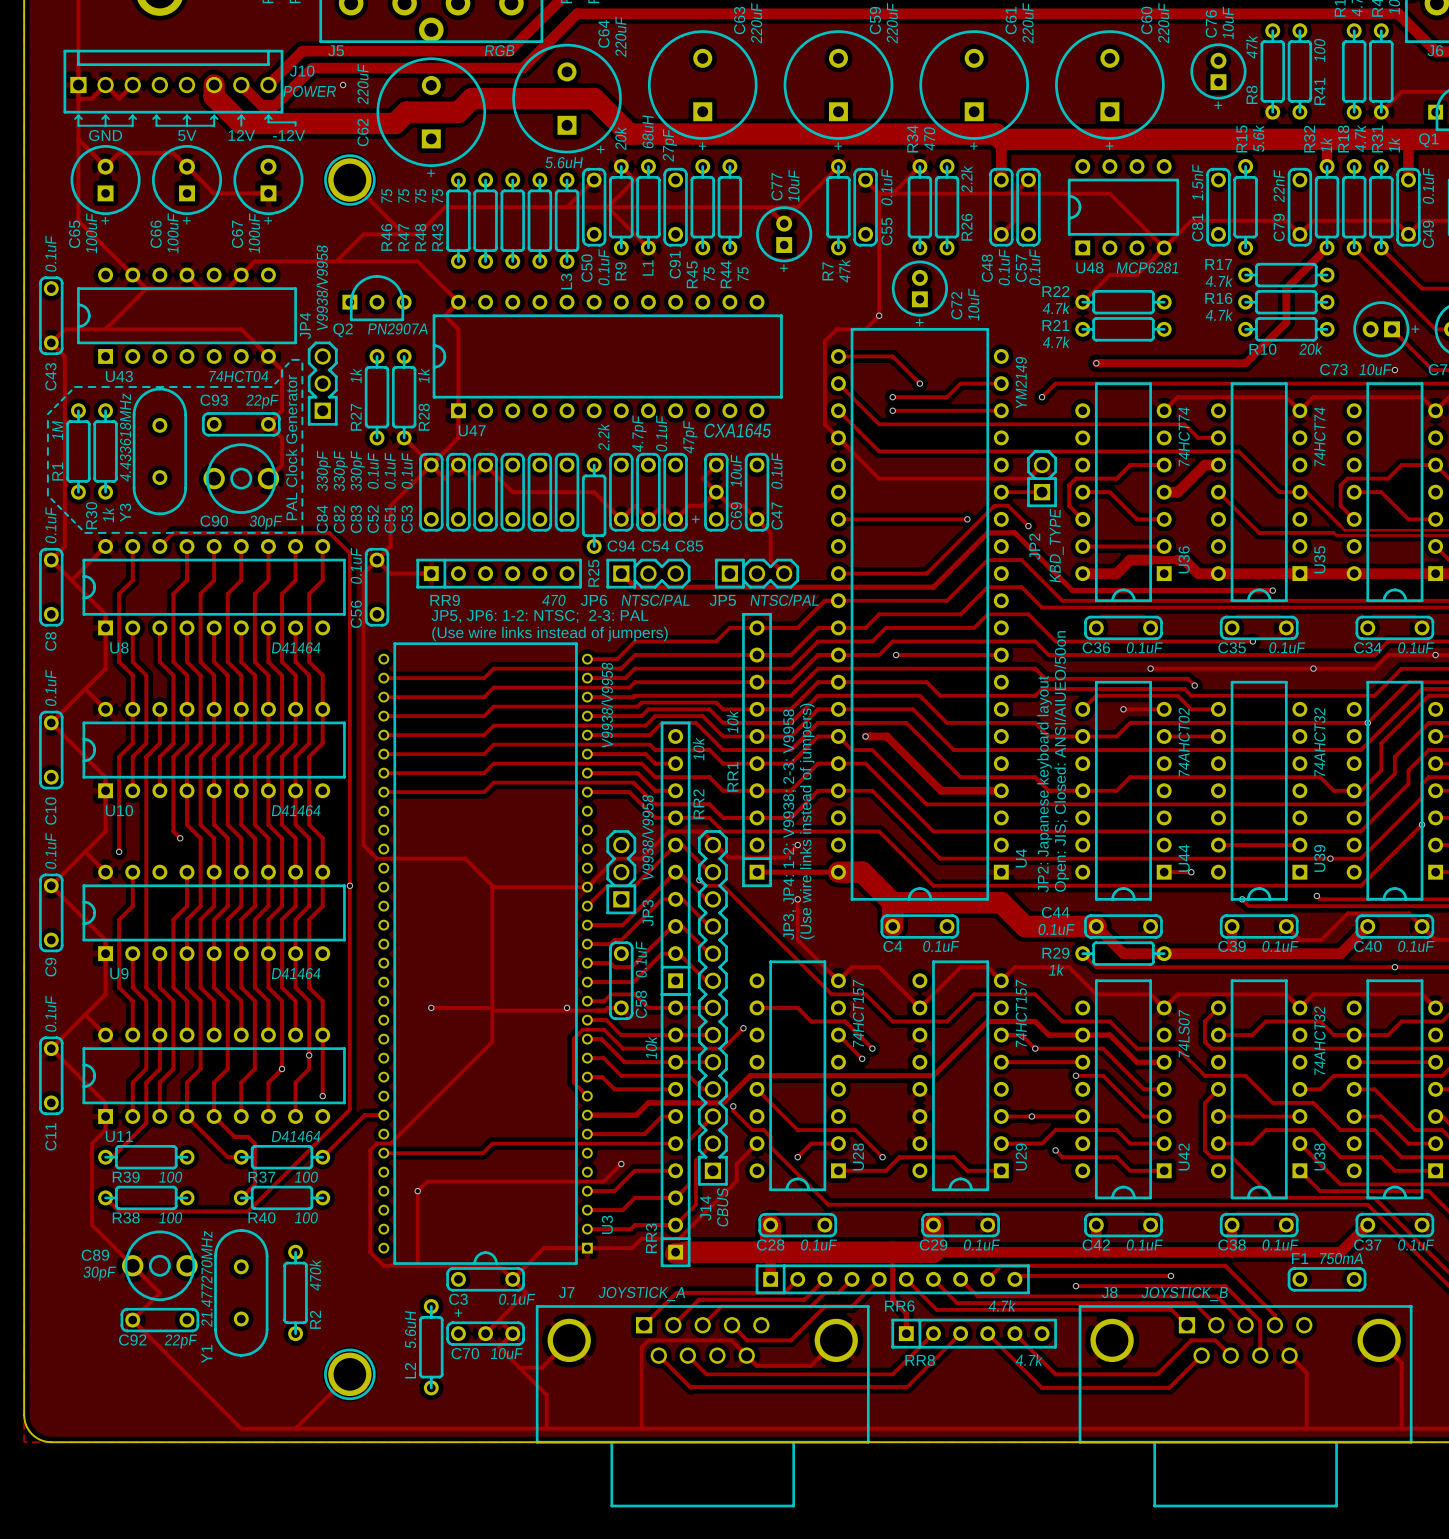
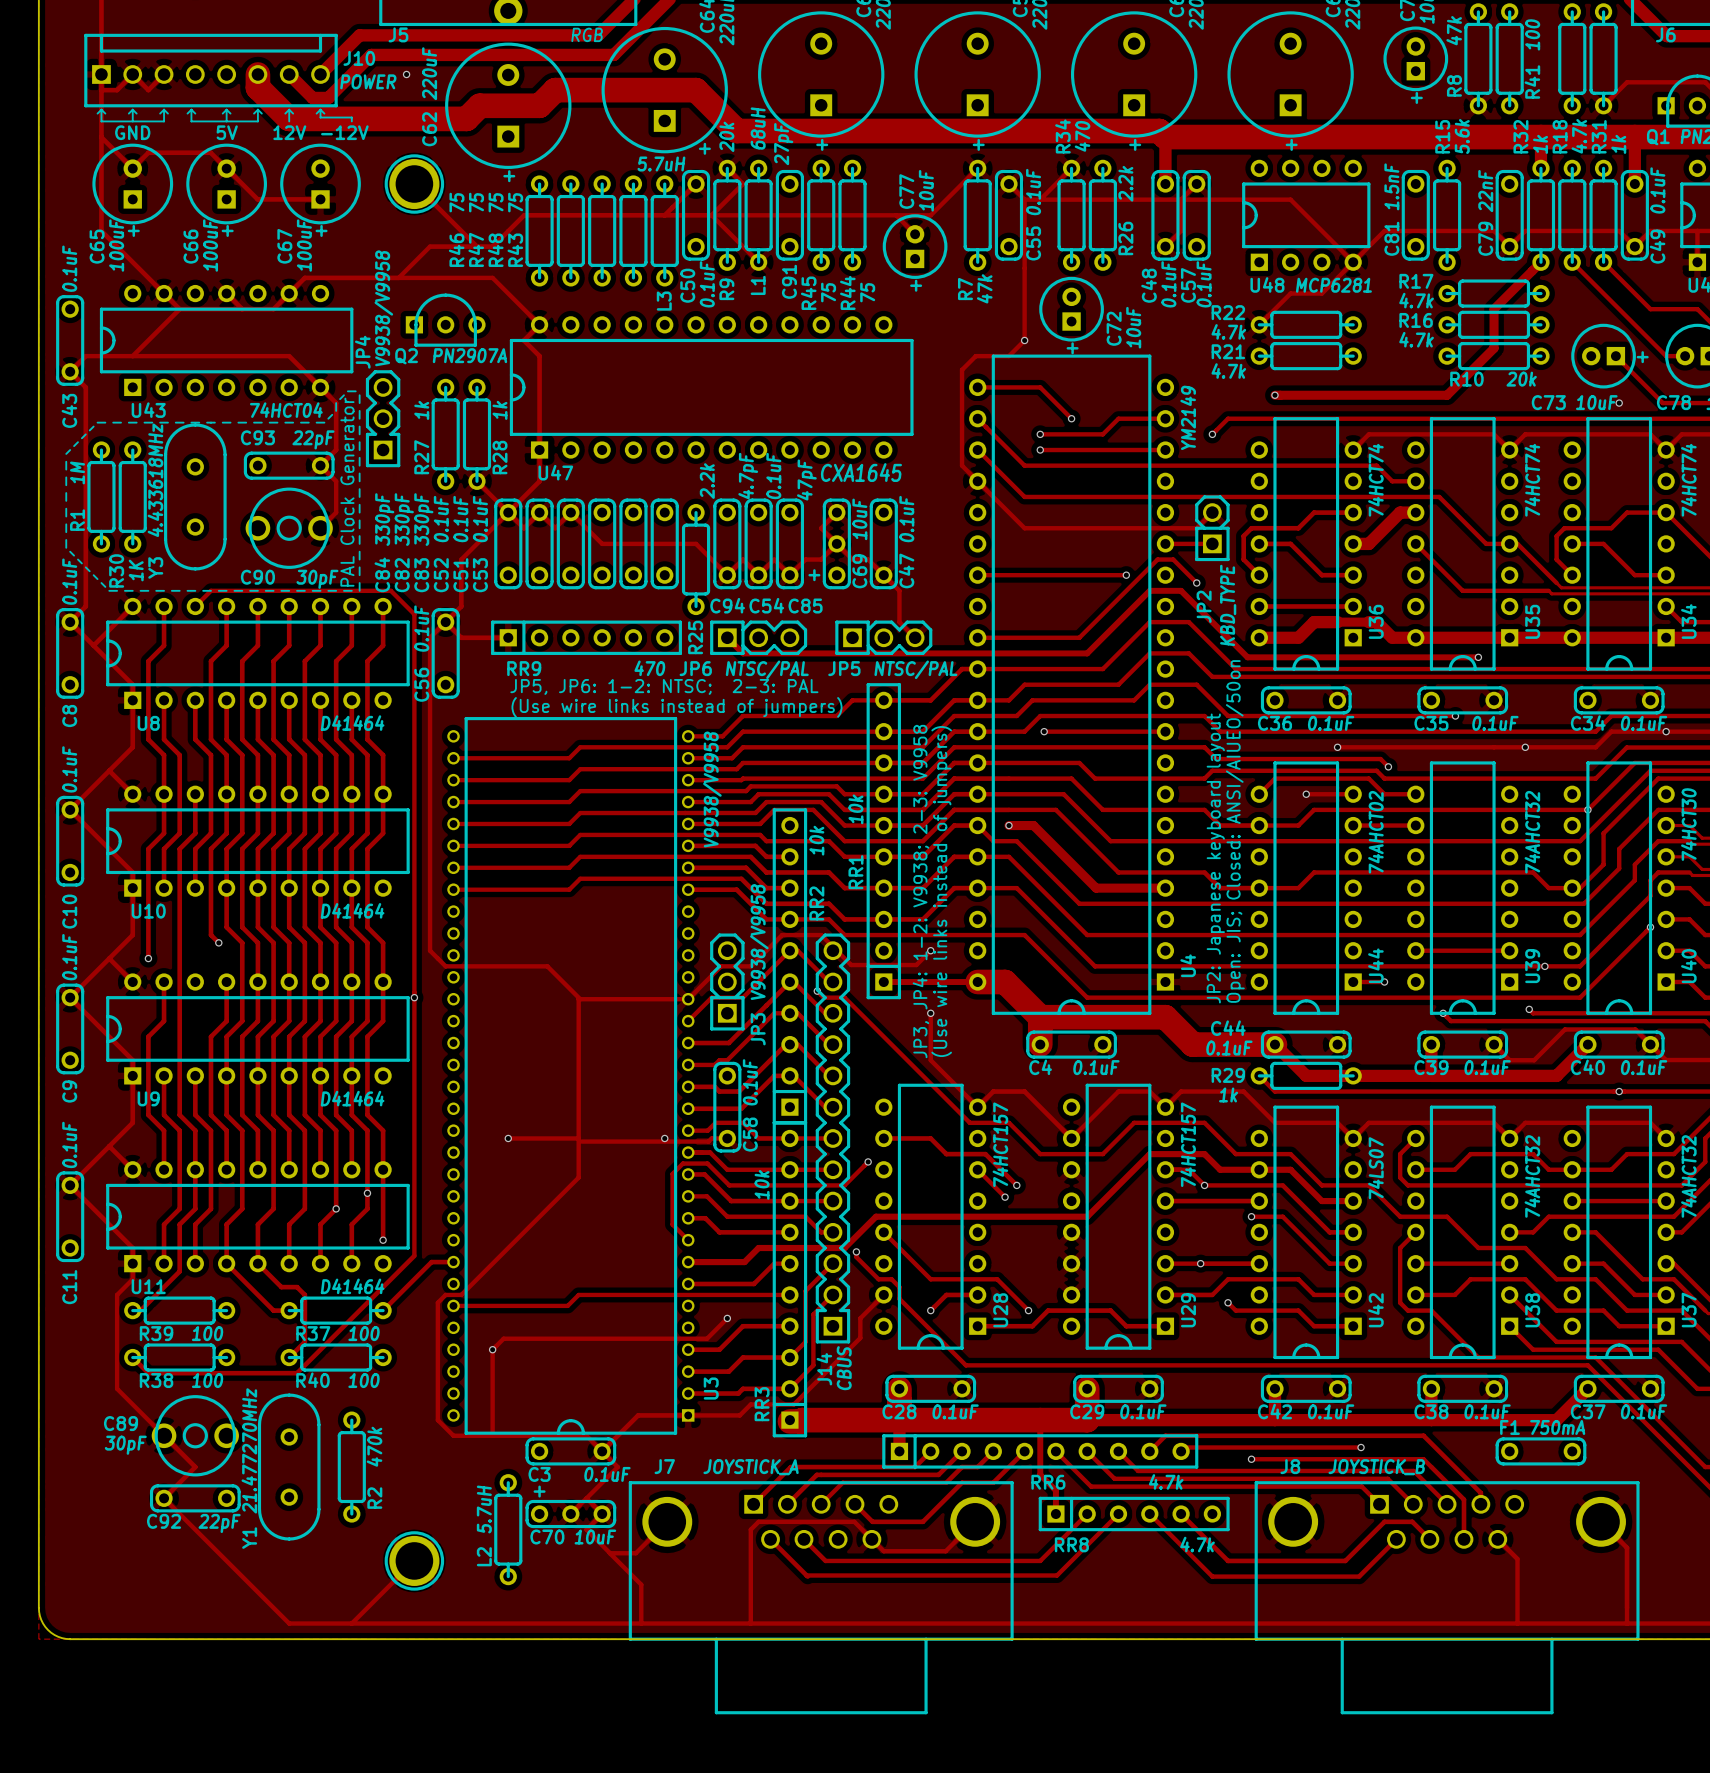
L3 value: 5.6uH (564, 162) -> 5.7uH (661, 163)
R30 value: 1k (108, 514) -> 1K (136, 570)
L2 value: 5.6uH (410, 1329) -> 5.7uH (484, 1509)

